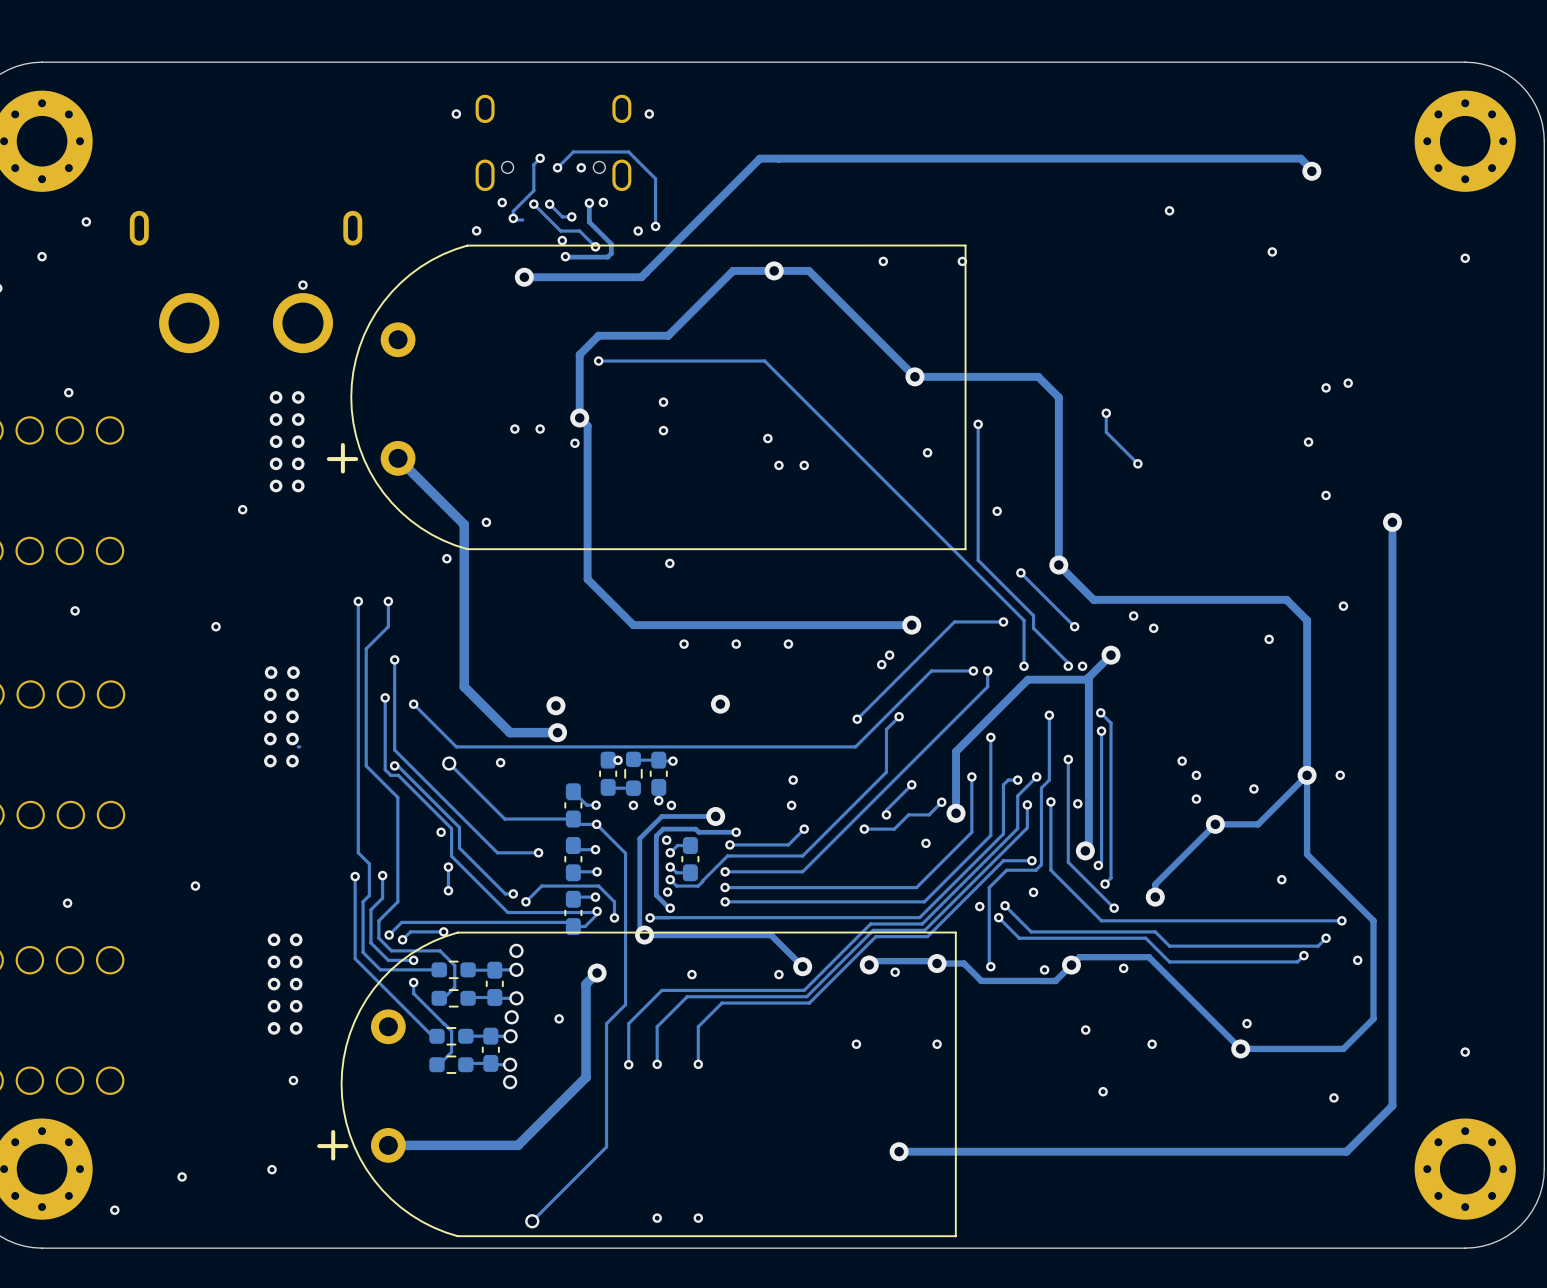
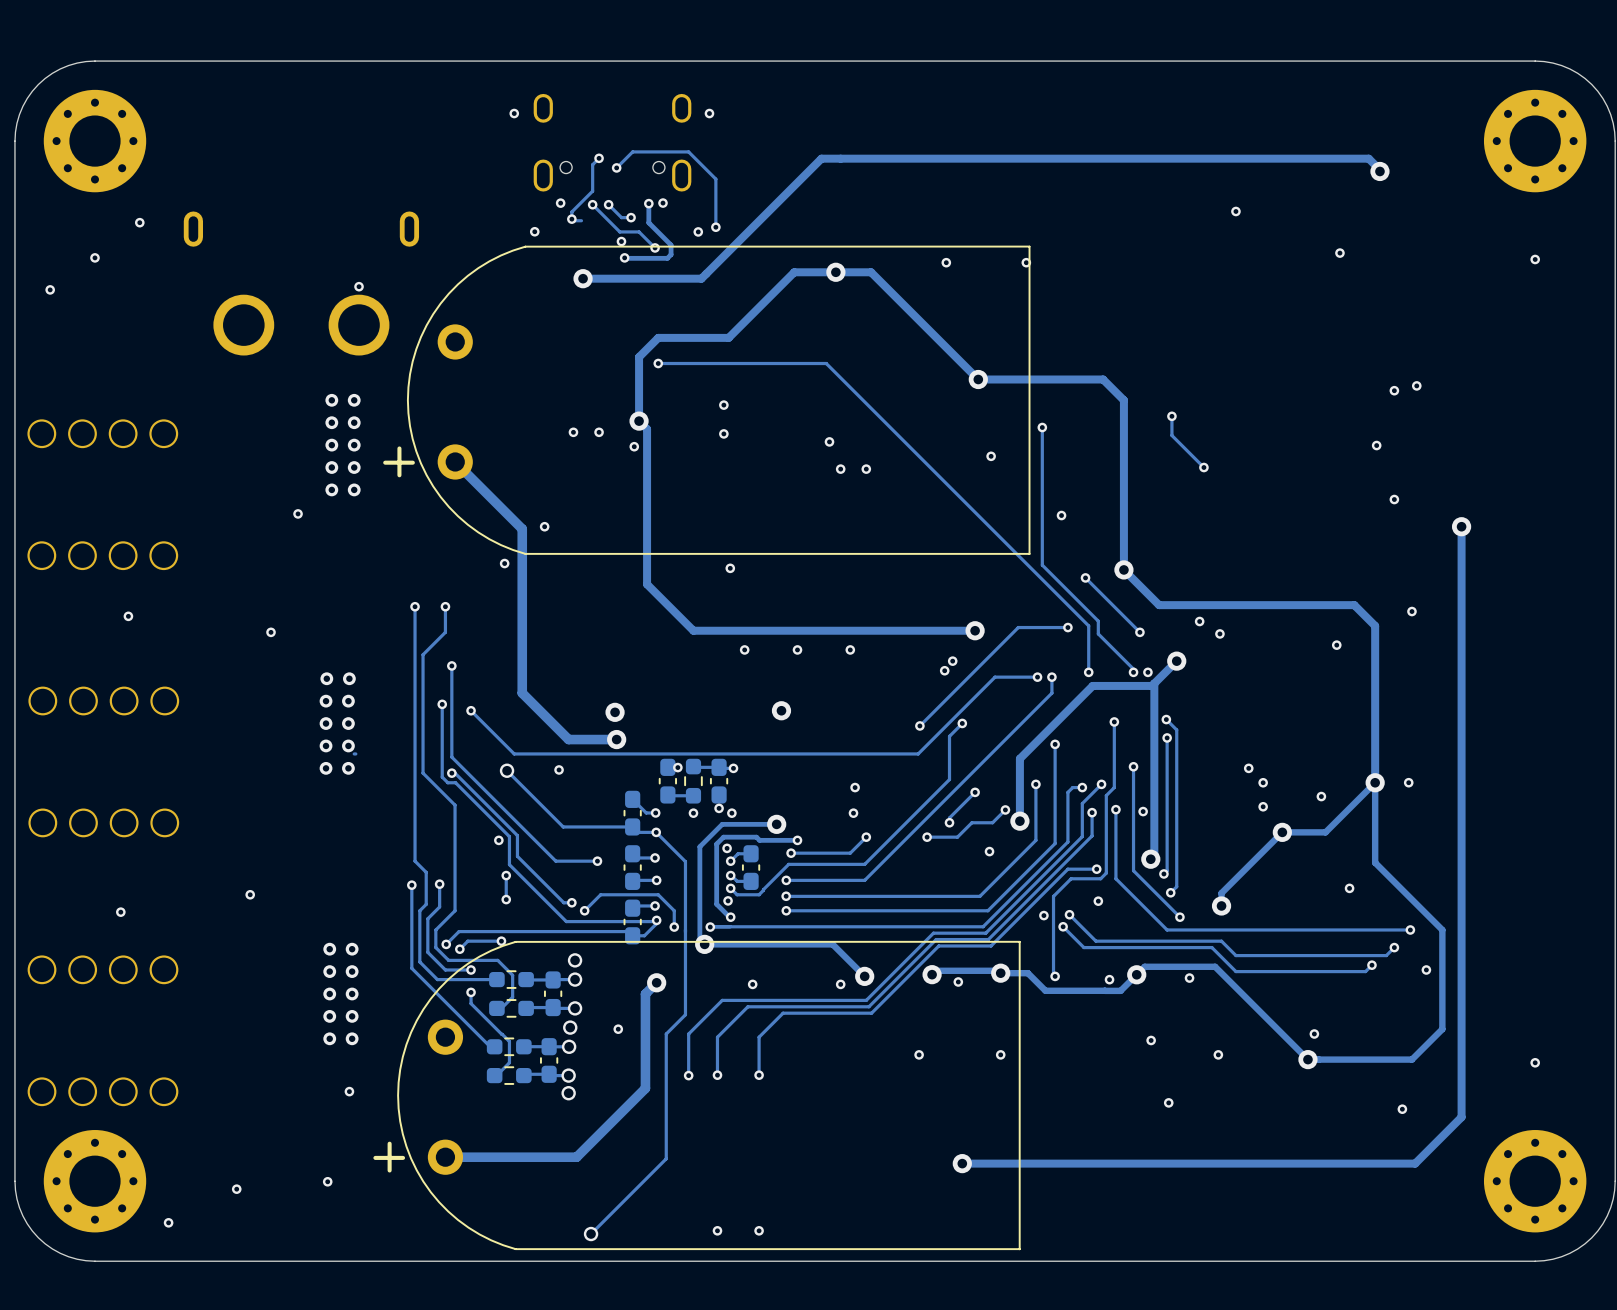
via: (581, 167) -> none
via: (68, 392) -> none

